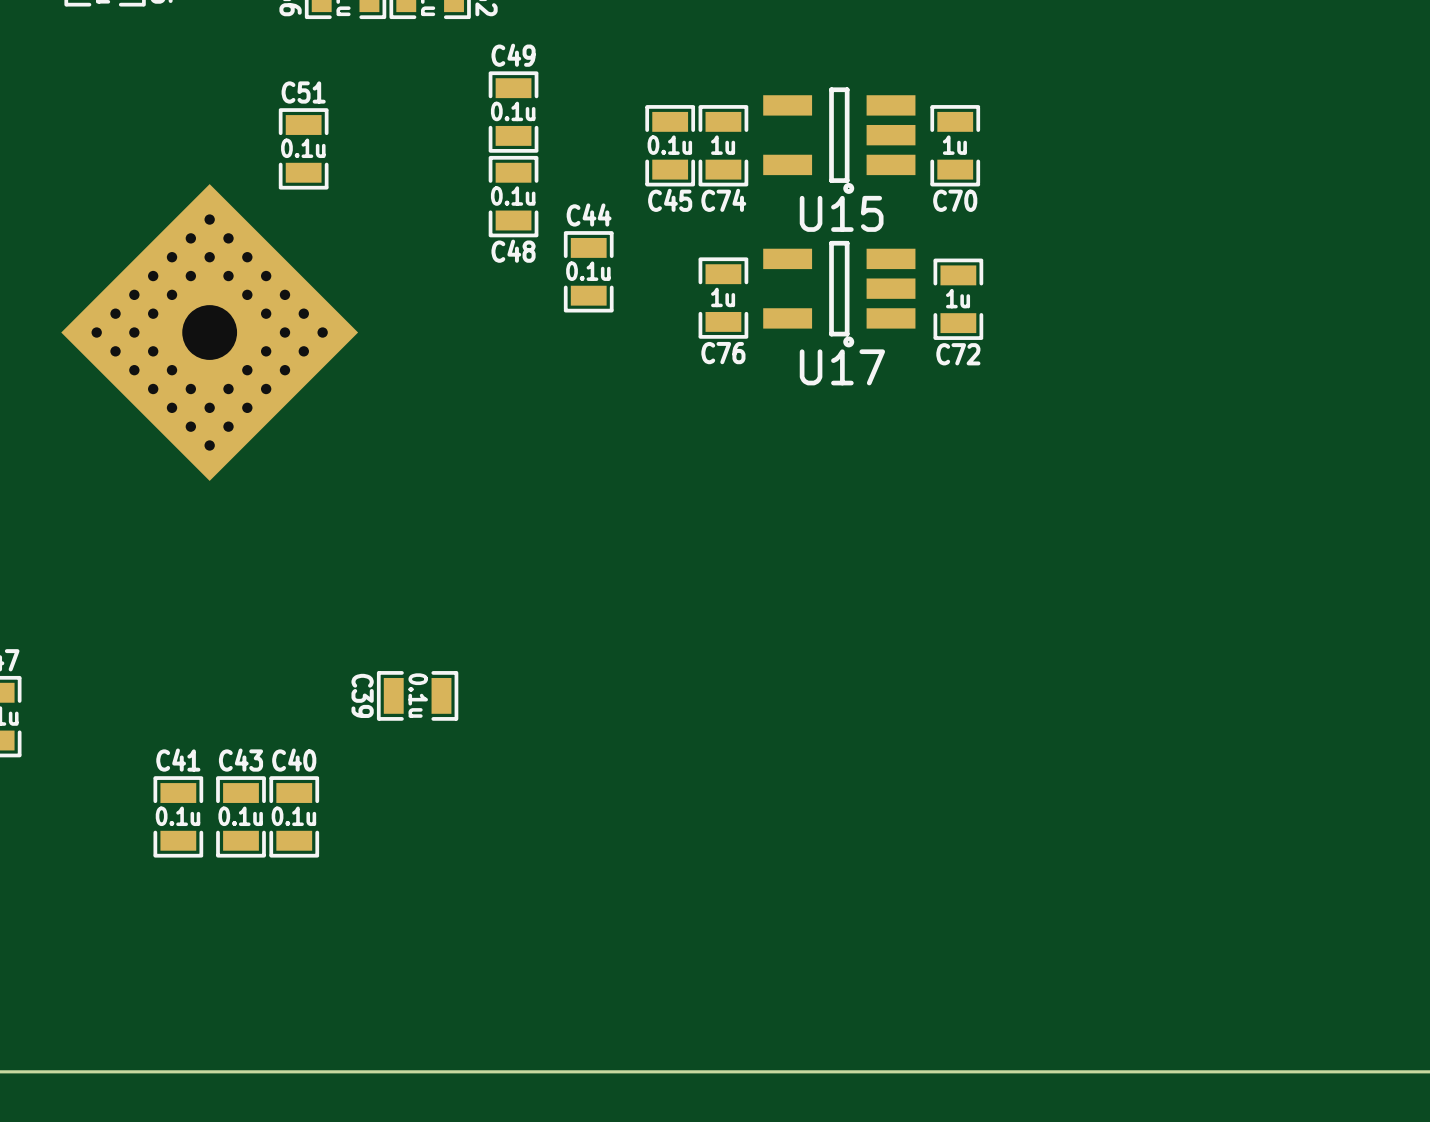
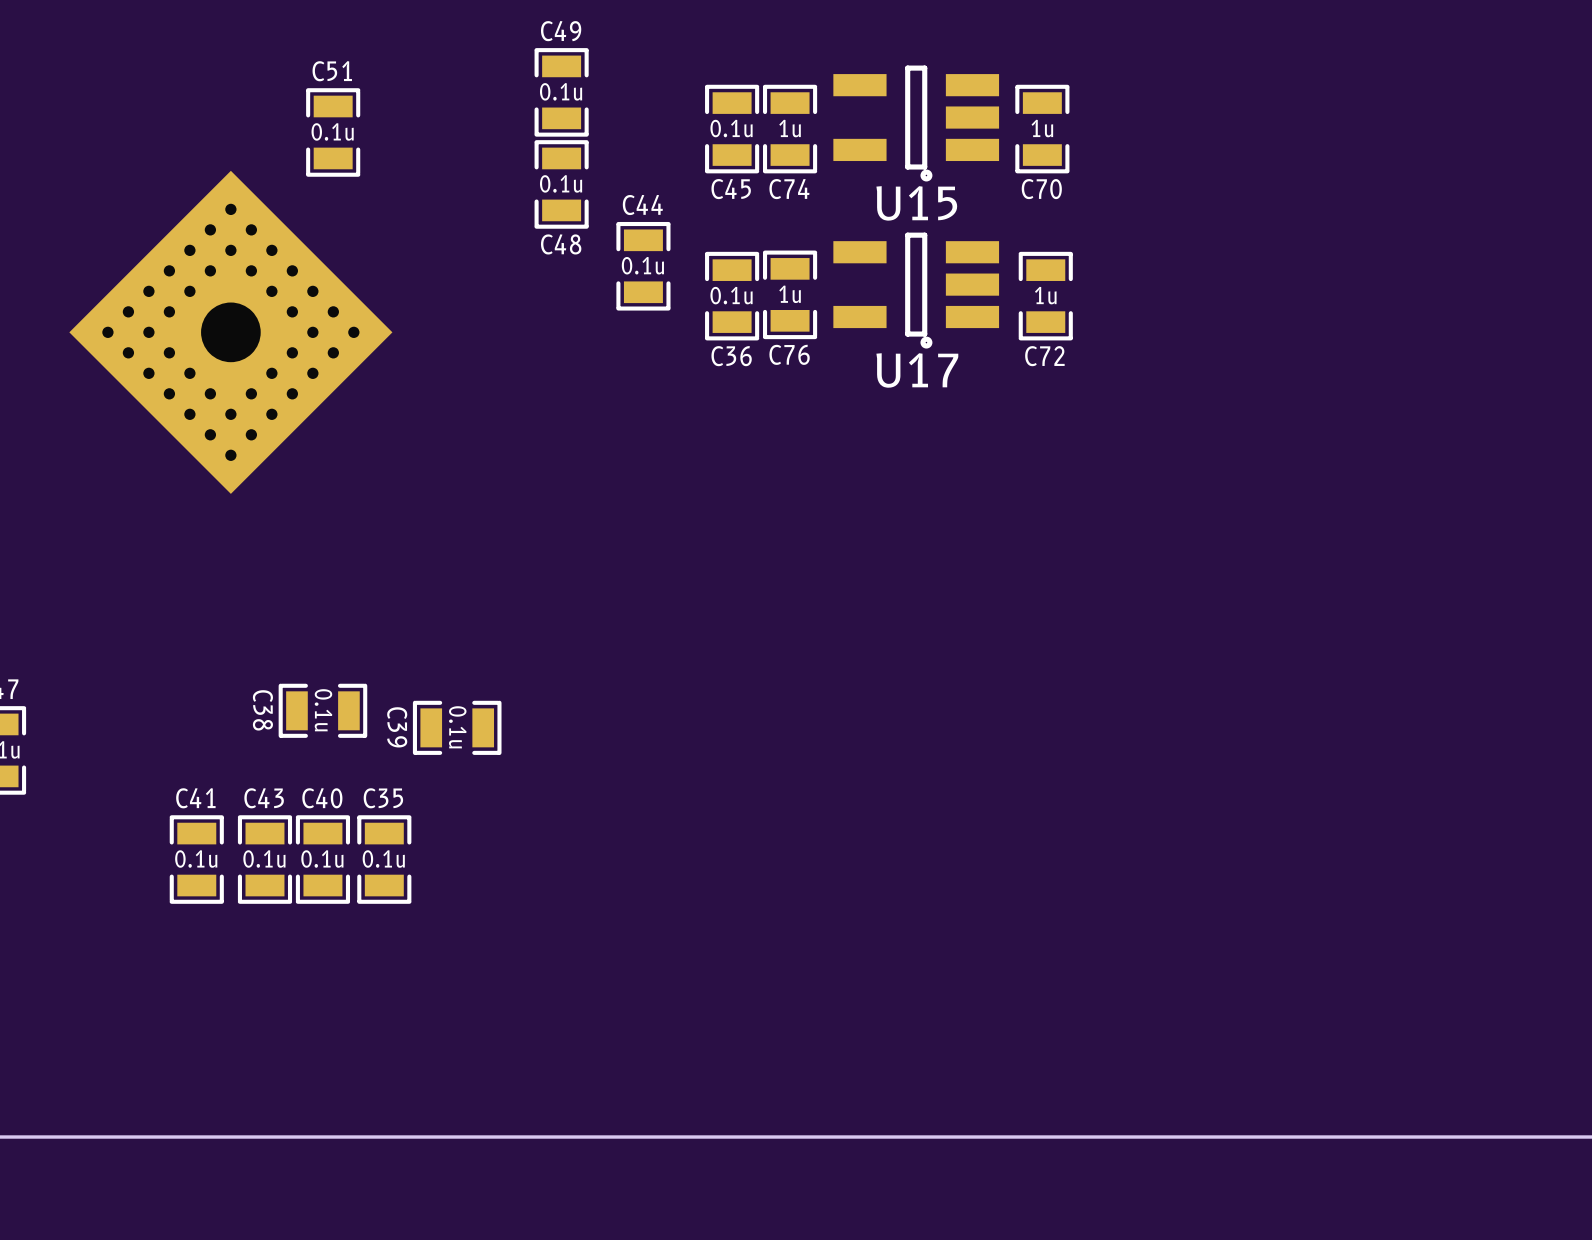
C36: none -> 0.1u (732, 296)
C38: none -> 0.1u (322, 710)
C35: none -> 0.1u (384, 859)

